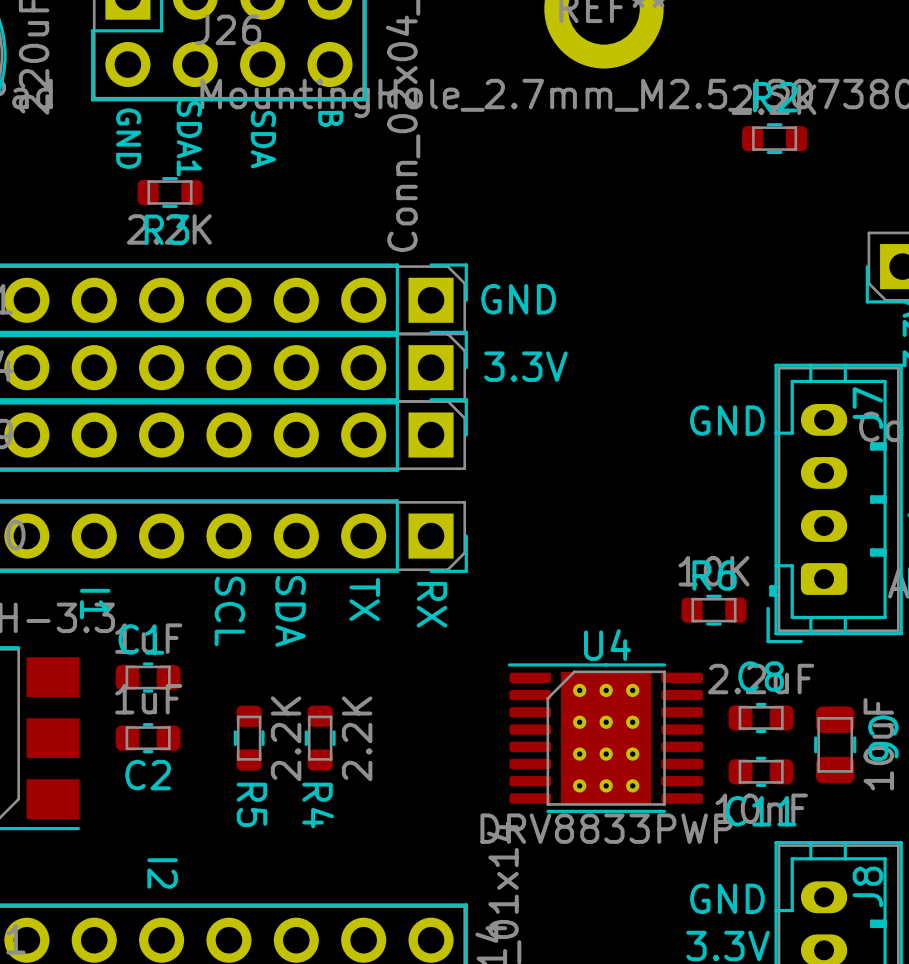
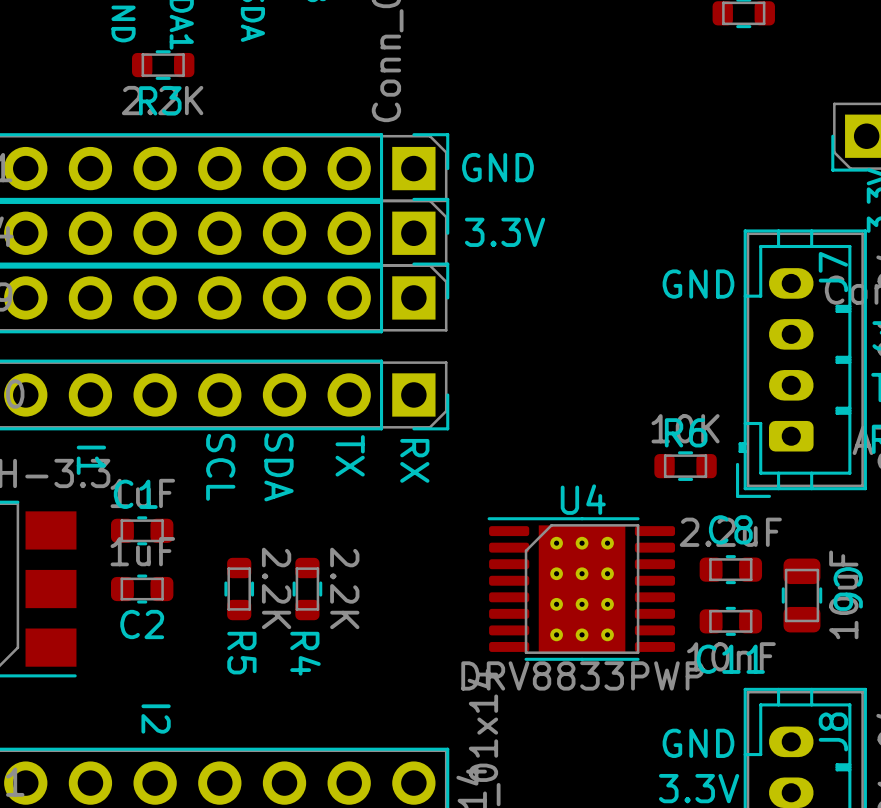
R5 value rotation: 0° (286, 738) -> 180° (276, 588)
R4 value rotation: 0° (357, 738) -> 180° (344, 588)

